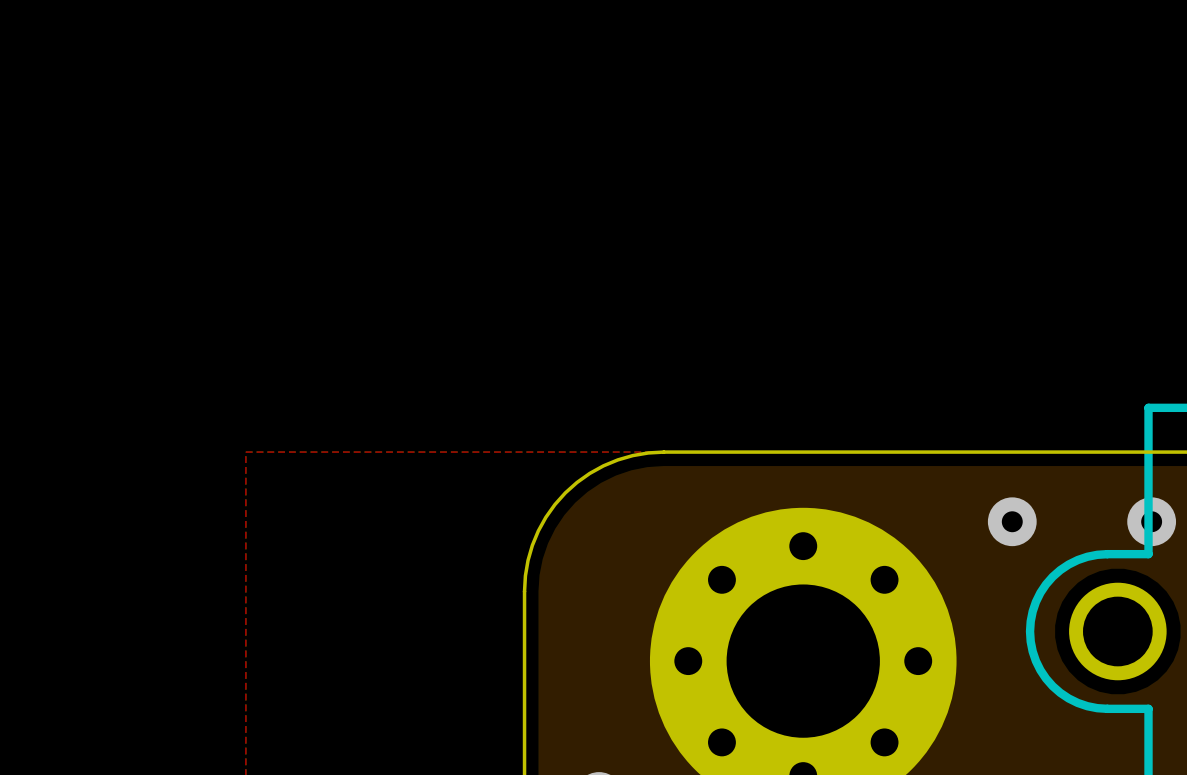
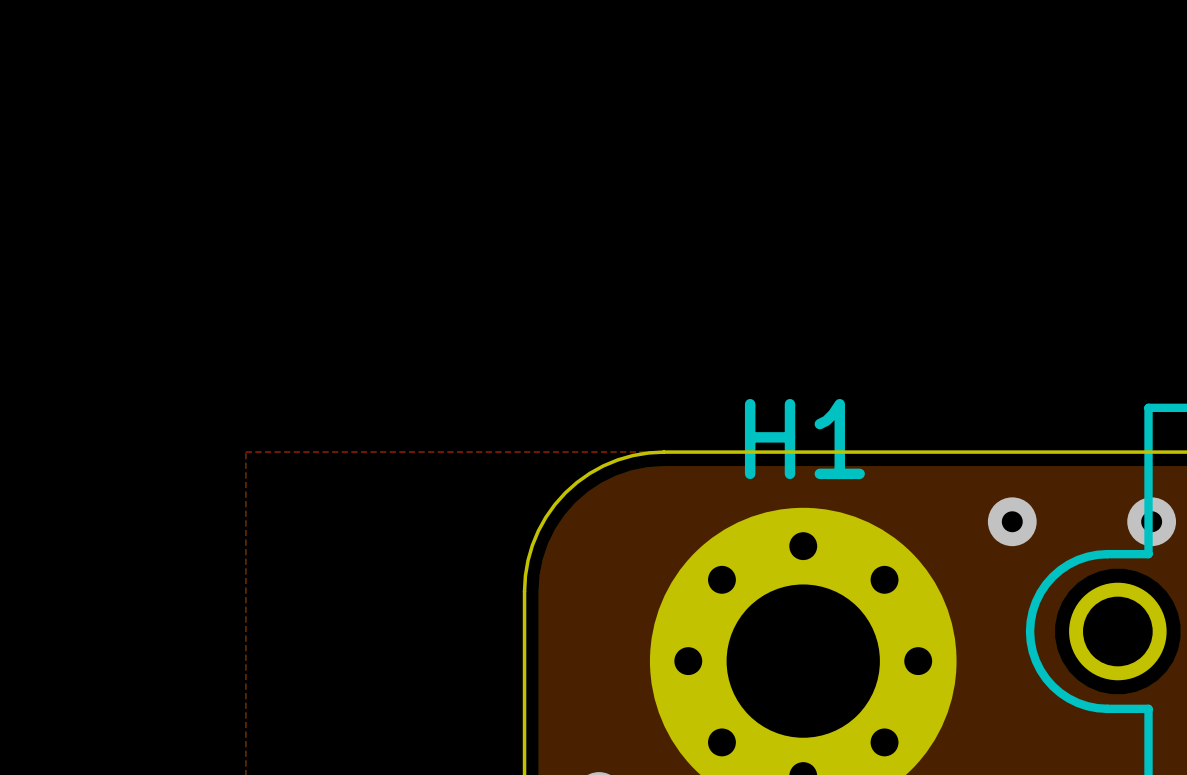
H1 name: none -> H1 (804, 439)

